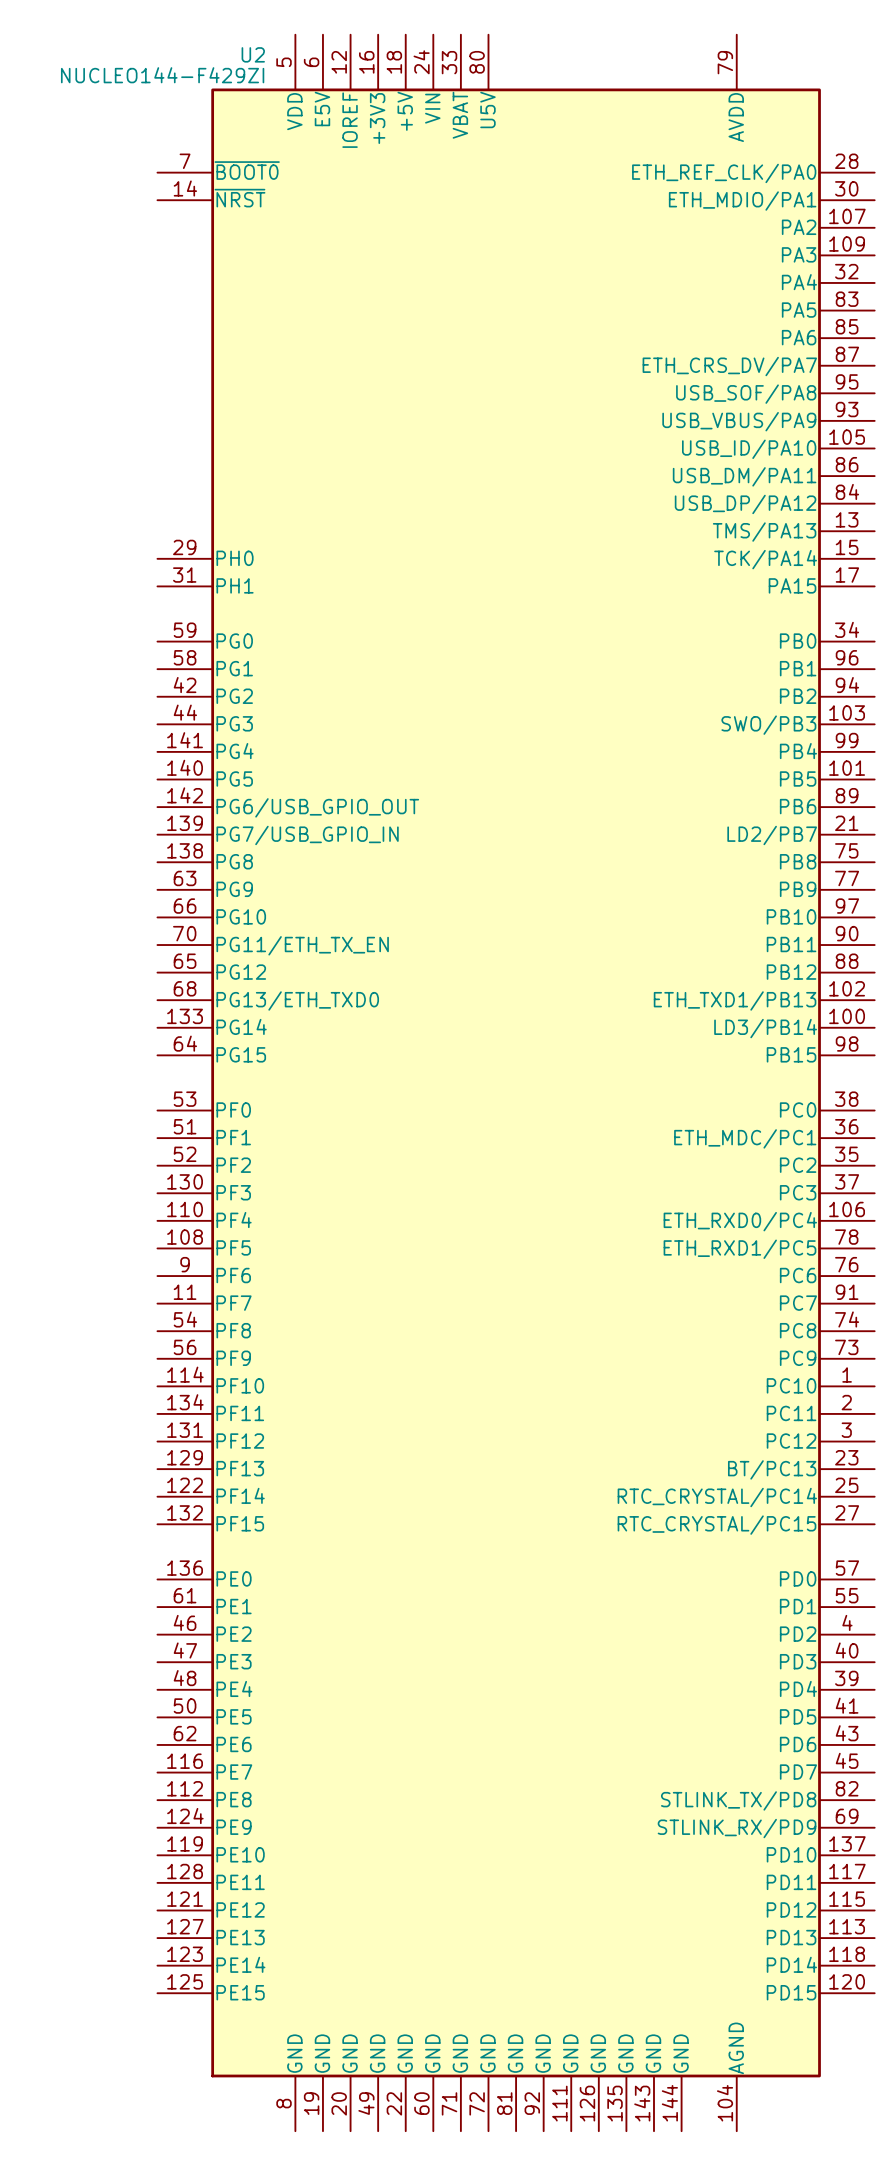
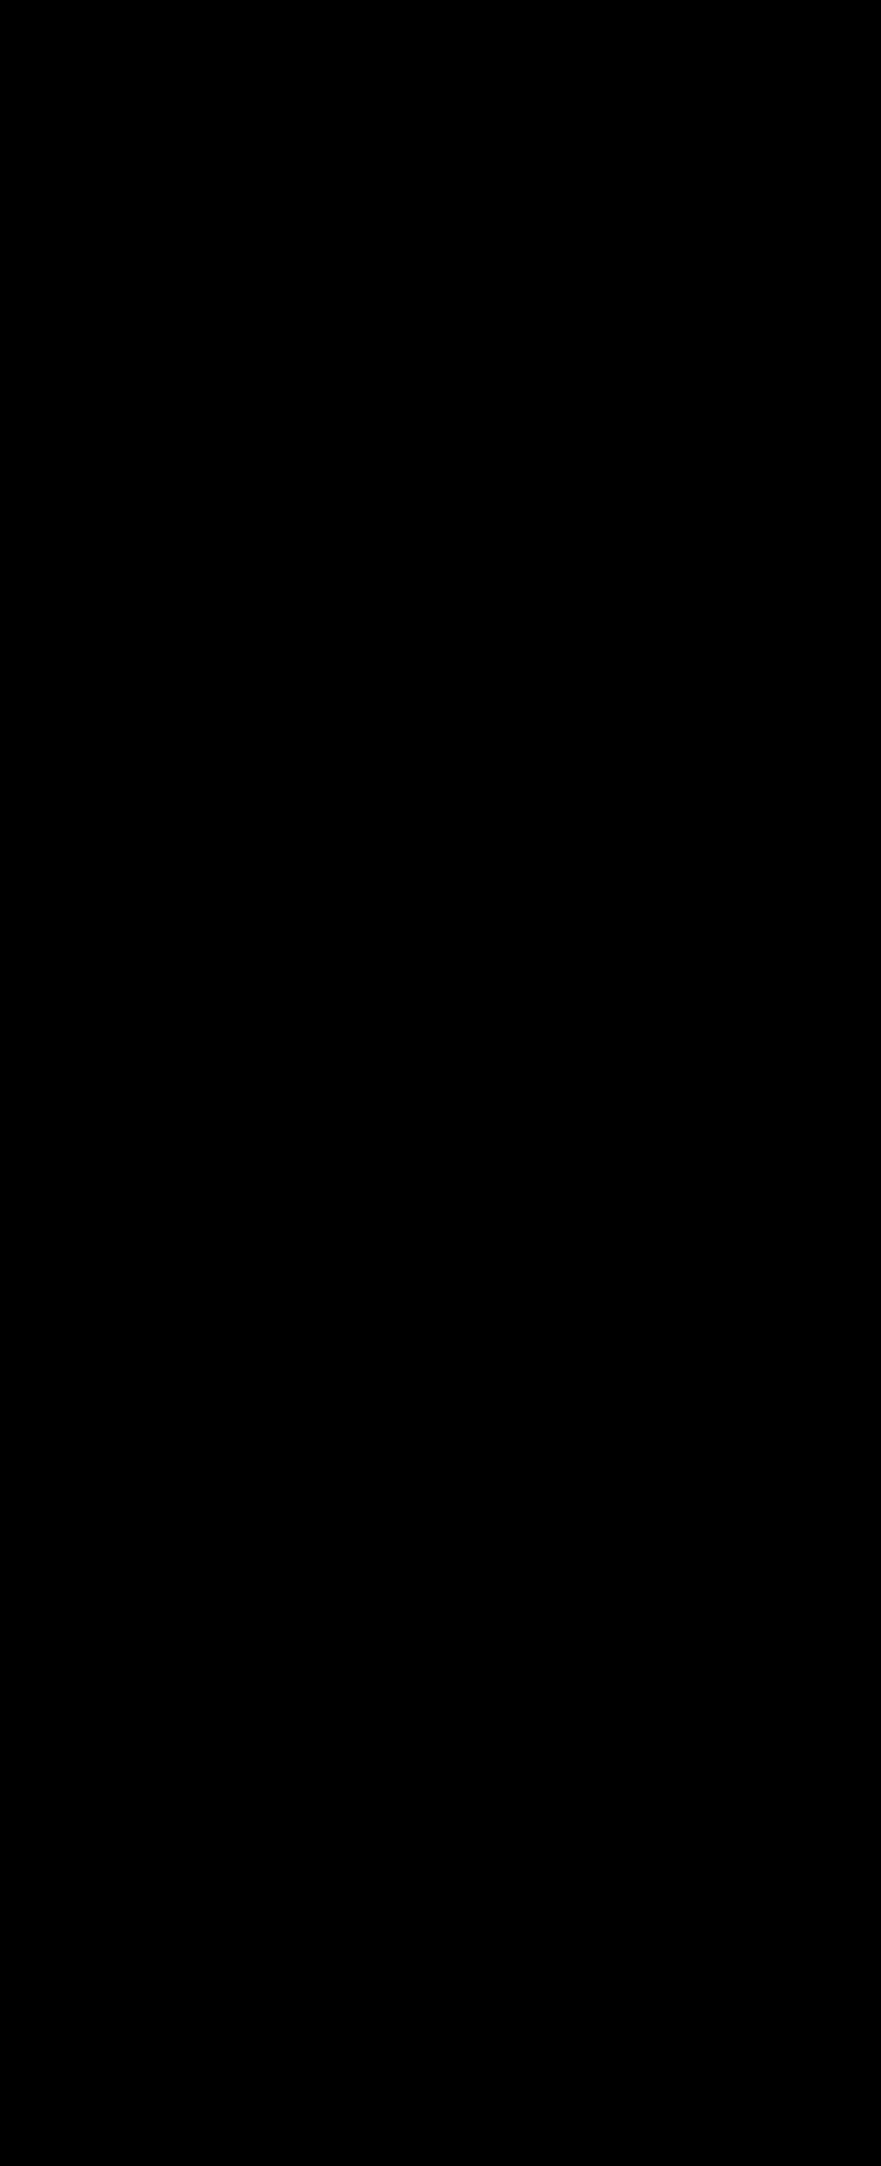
U2: NUCLEO144-F429ZI (516, 1082) -> none

